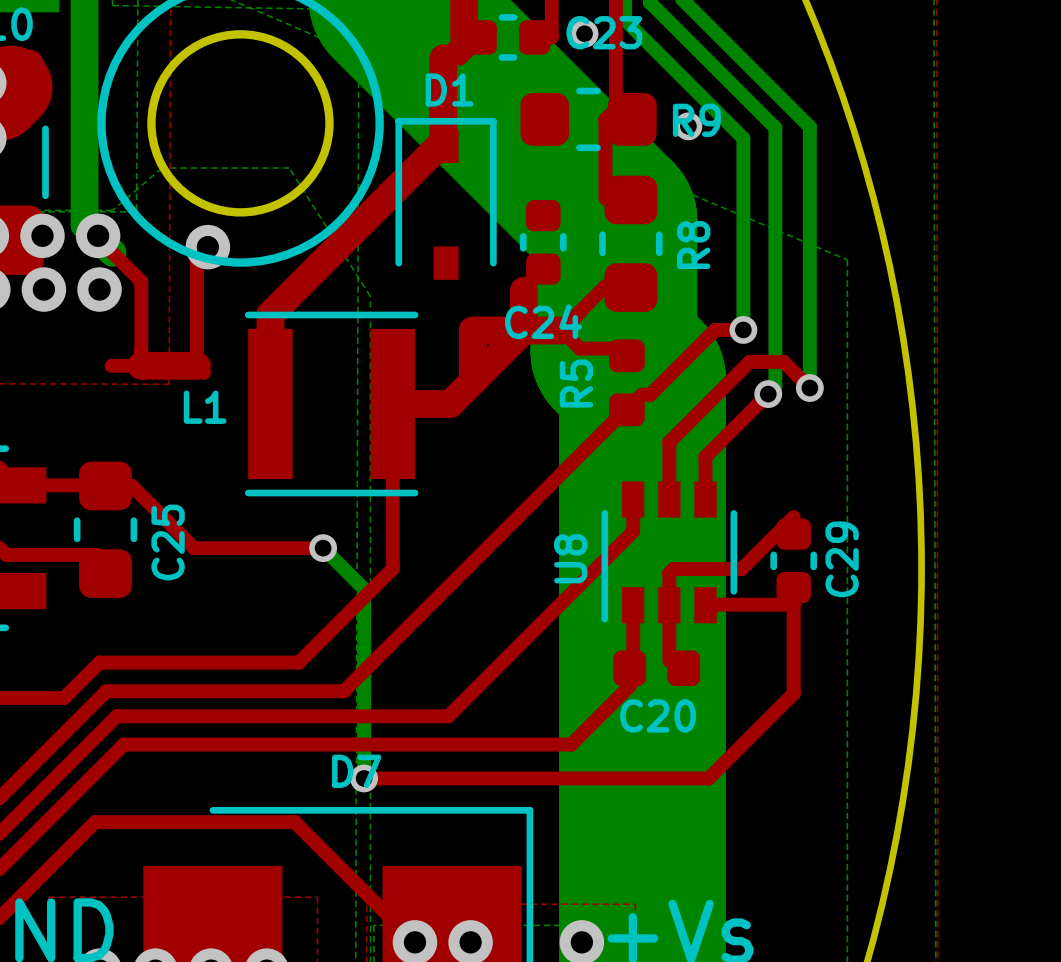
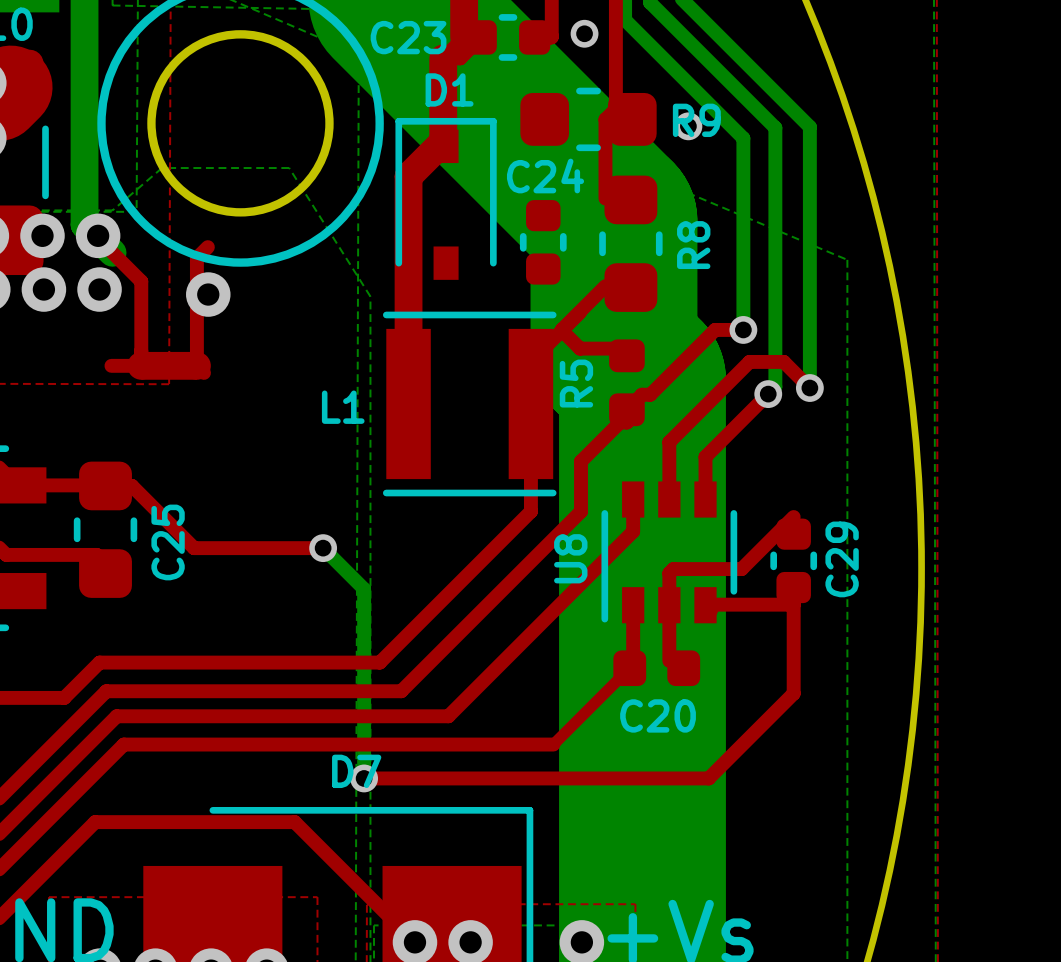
C23 name position: C23 (604, 32) -> C23 (408, 37)
top track: (408, 176) (270, 314) (270, 403) -> (408, 176) (408, 403)
via position: (207, 247) -> (208, 294)
top track: (543, 269) (523, 288) (523, 330) (450, 403) (392, 403) (392, 568) (298, 662) -> (561, 330) (530, 361) (530, 511) (379, 662) (298, 662)
C24 name position: C24 (543, 321) -> C24 (545, 176)
top track: (561, 330) (472, 330) (472, 379) -> none
L1 position: (331, 403) -> (469, 403)
top track: (626, 409) (623, 406) (623, 411) (343, 691) -> (626, 409) (626, 422) (619, 422) (581, 461) (581, 511) (401, 691) (343, 691)
top track: (629, 668) (629, 686) (571, 744) (553, 744) -> (629, 668) (553, 744)

